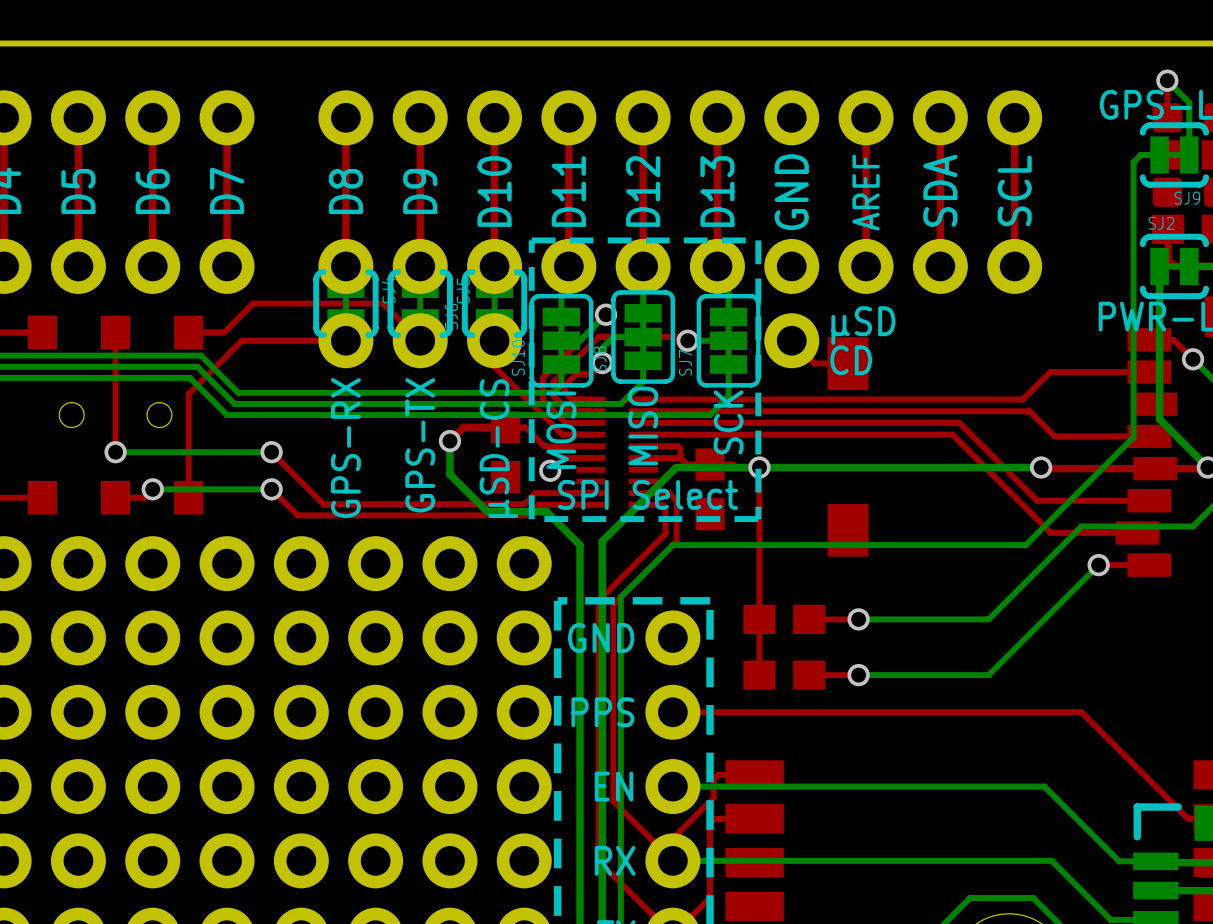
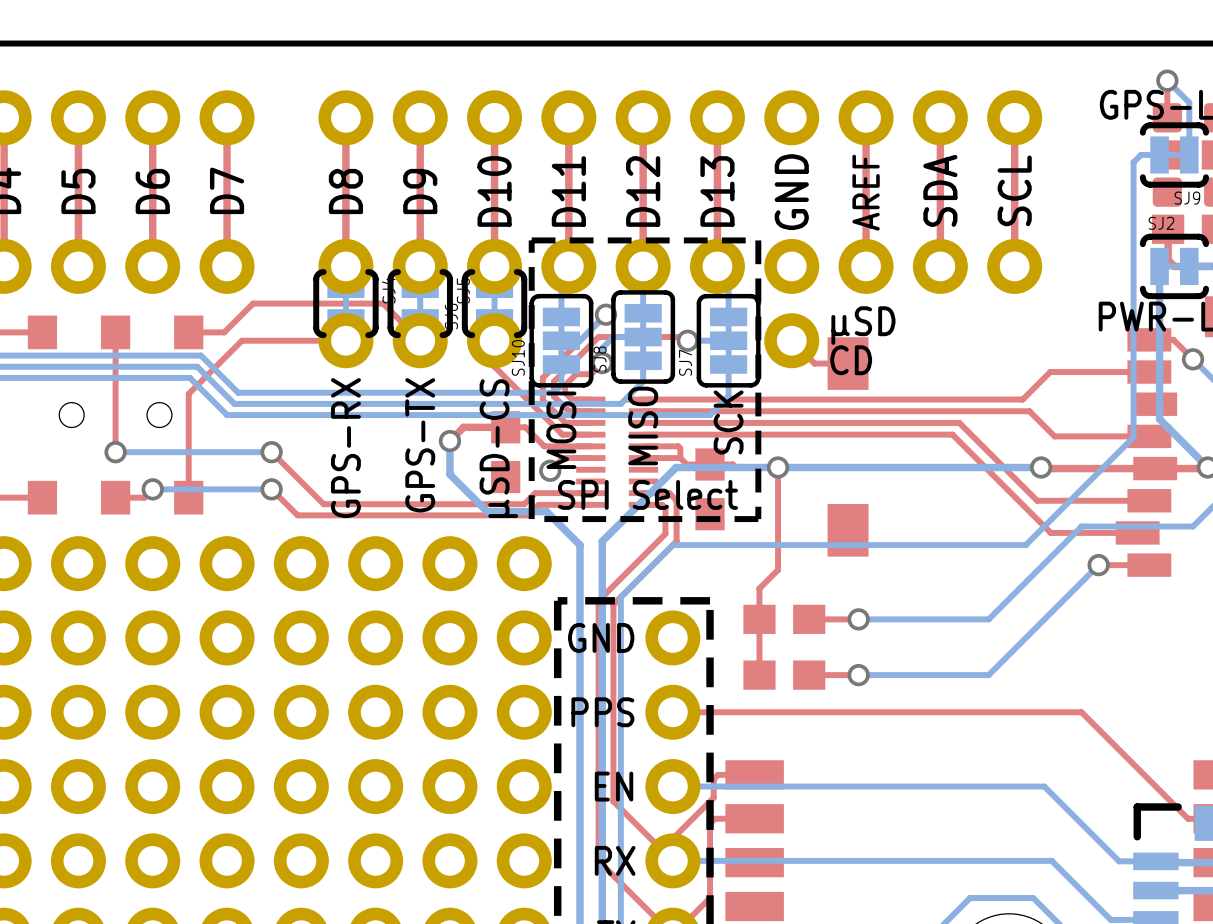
top track: (759, 467) (759, 588) -> (759, 467) (778, 467) (778, 569) (759, 588)
via position: (759, 467) -> (778, 467)

